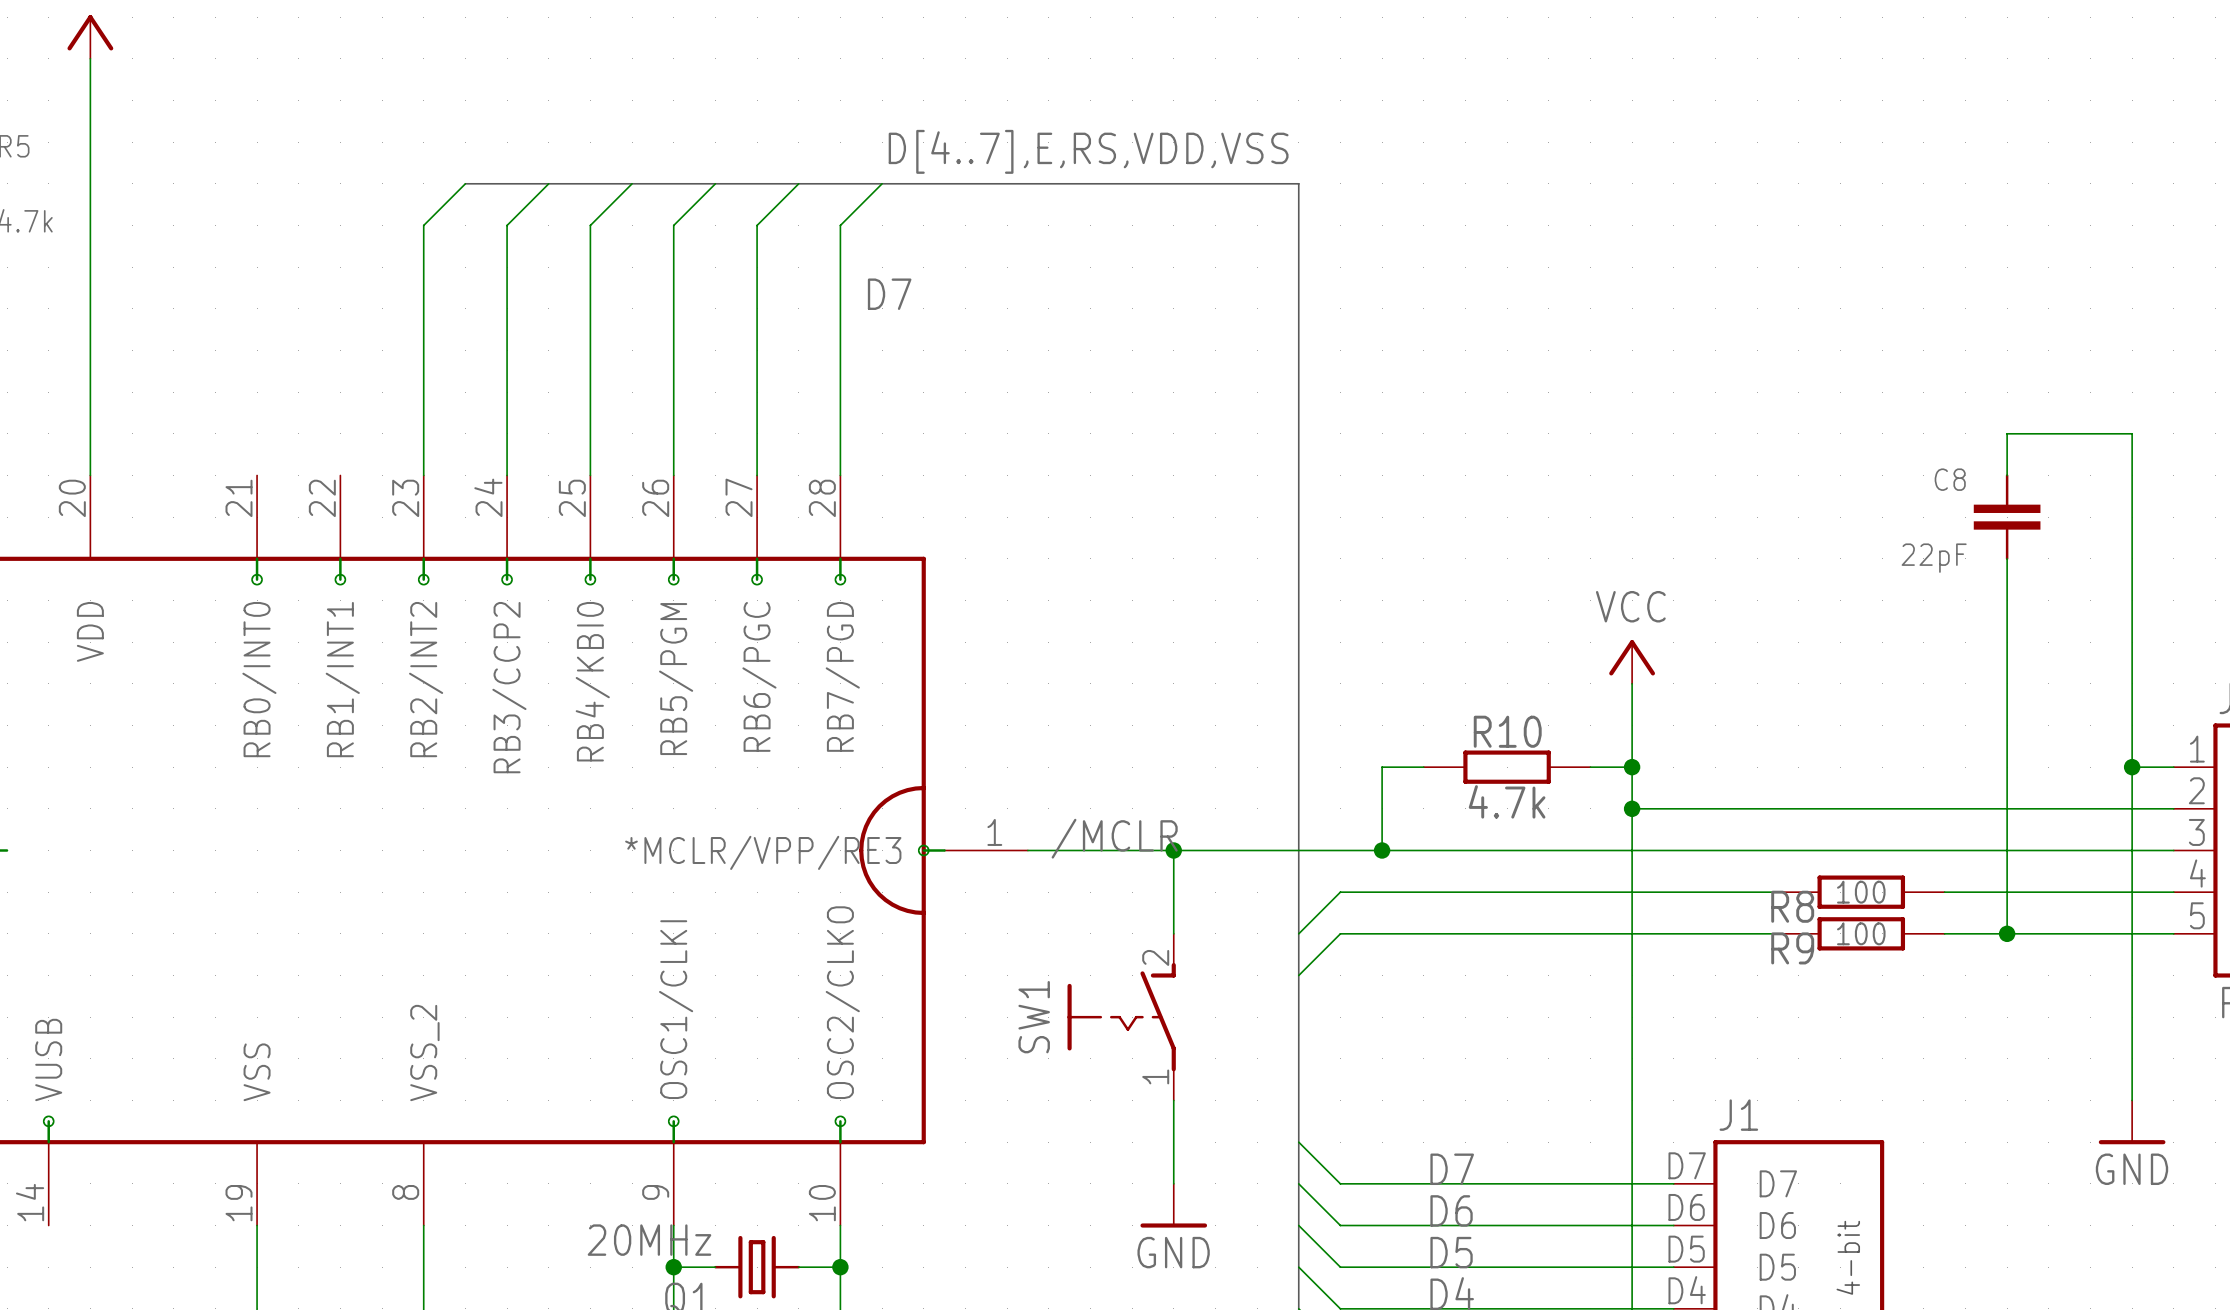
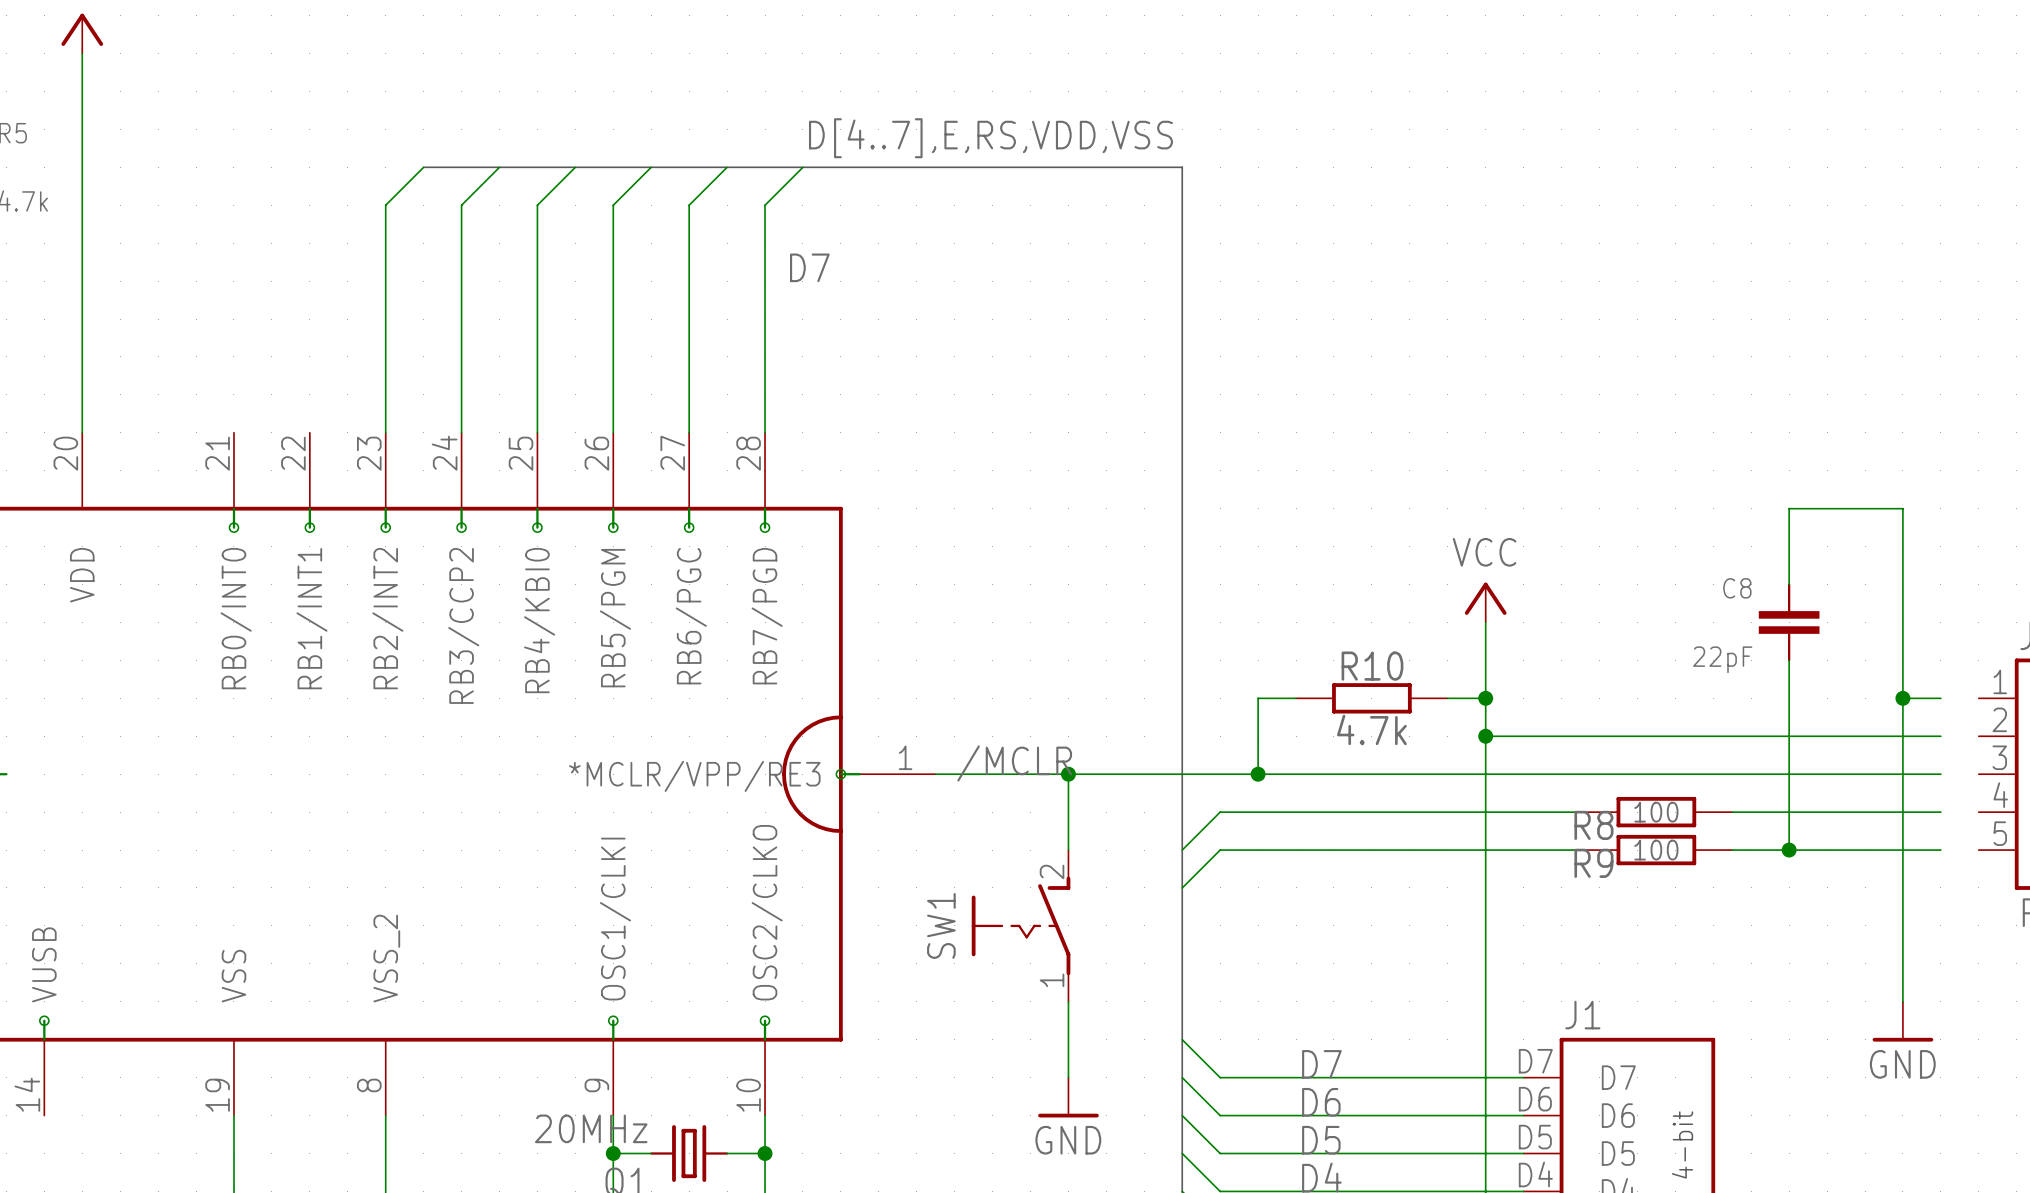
wire: (2007, 475) (2007, 433) (2132, 433) (2132, 1100) -> none
C8 position: (2007, 517) -> (1789, 622)
wire: (2007, 558) (2007, 933) -> none
wire: none -> (1789, 584) (1789, 508) (1902, 508) (1902, 1001)
wire: none -> (1789, 660) (1789, 850)
wire: (2132, 767) (2173, 767) -> (1940, 698) (1902, 698)
junction position: (2132, 767) -> (1902, 698)
wire: (2132, 808) (2173, 808) -> none
wire: (2132, 850) (2173, 850) -> none
R8 position: (1861, 892) -> (1656, 812)
wire: (2132, 892) (2173, 892) -> none
R9 position: (1861, 933) -> (1656, 850)
junction position: (2007, 933) -> (1789, 850)
wire: (2132, 933) (2173, 933) -> none
power symbol position: GND (2132, 1122) -> GND (1902, 1021)

